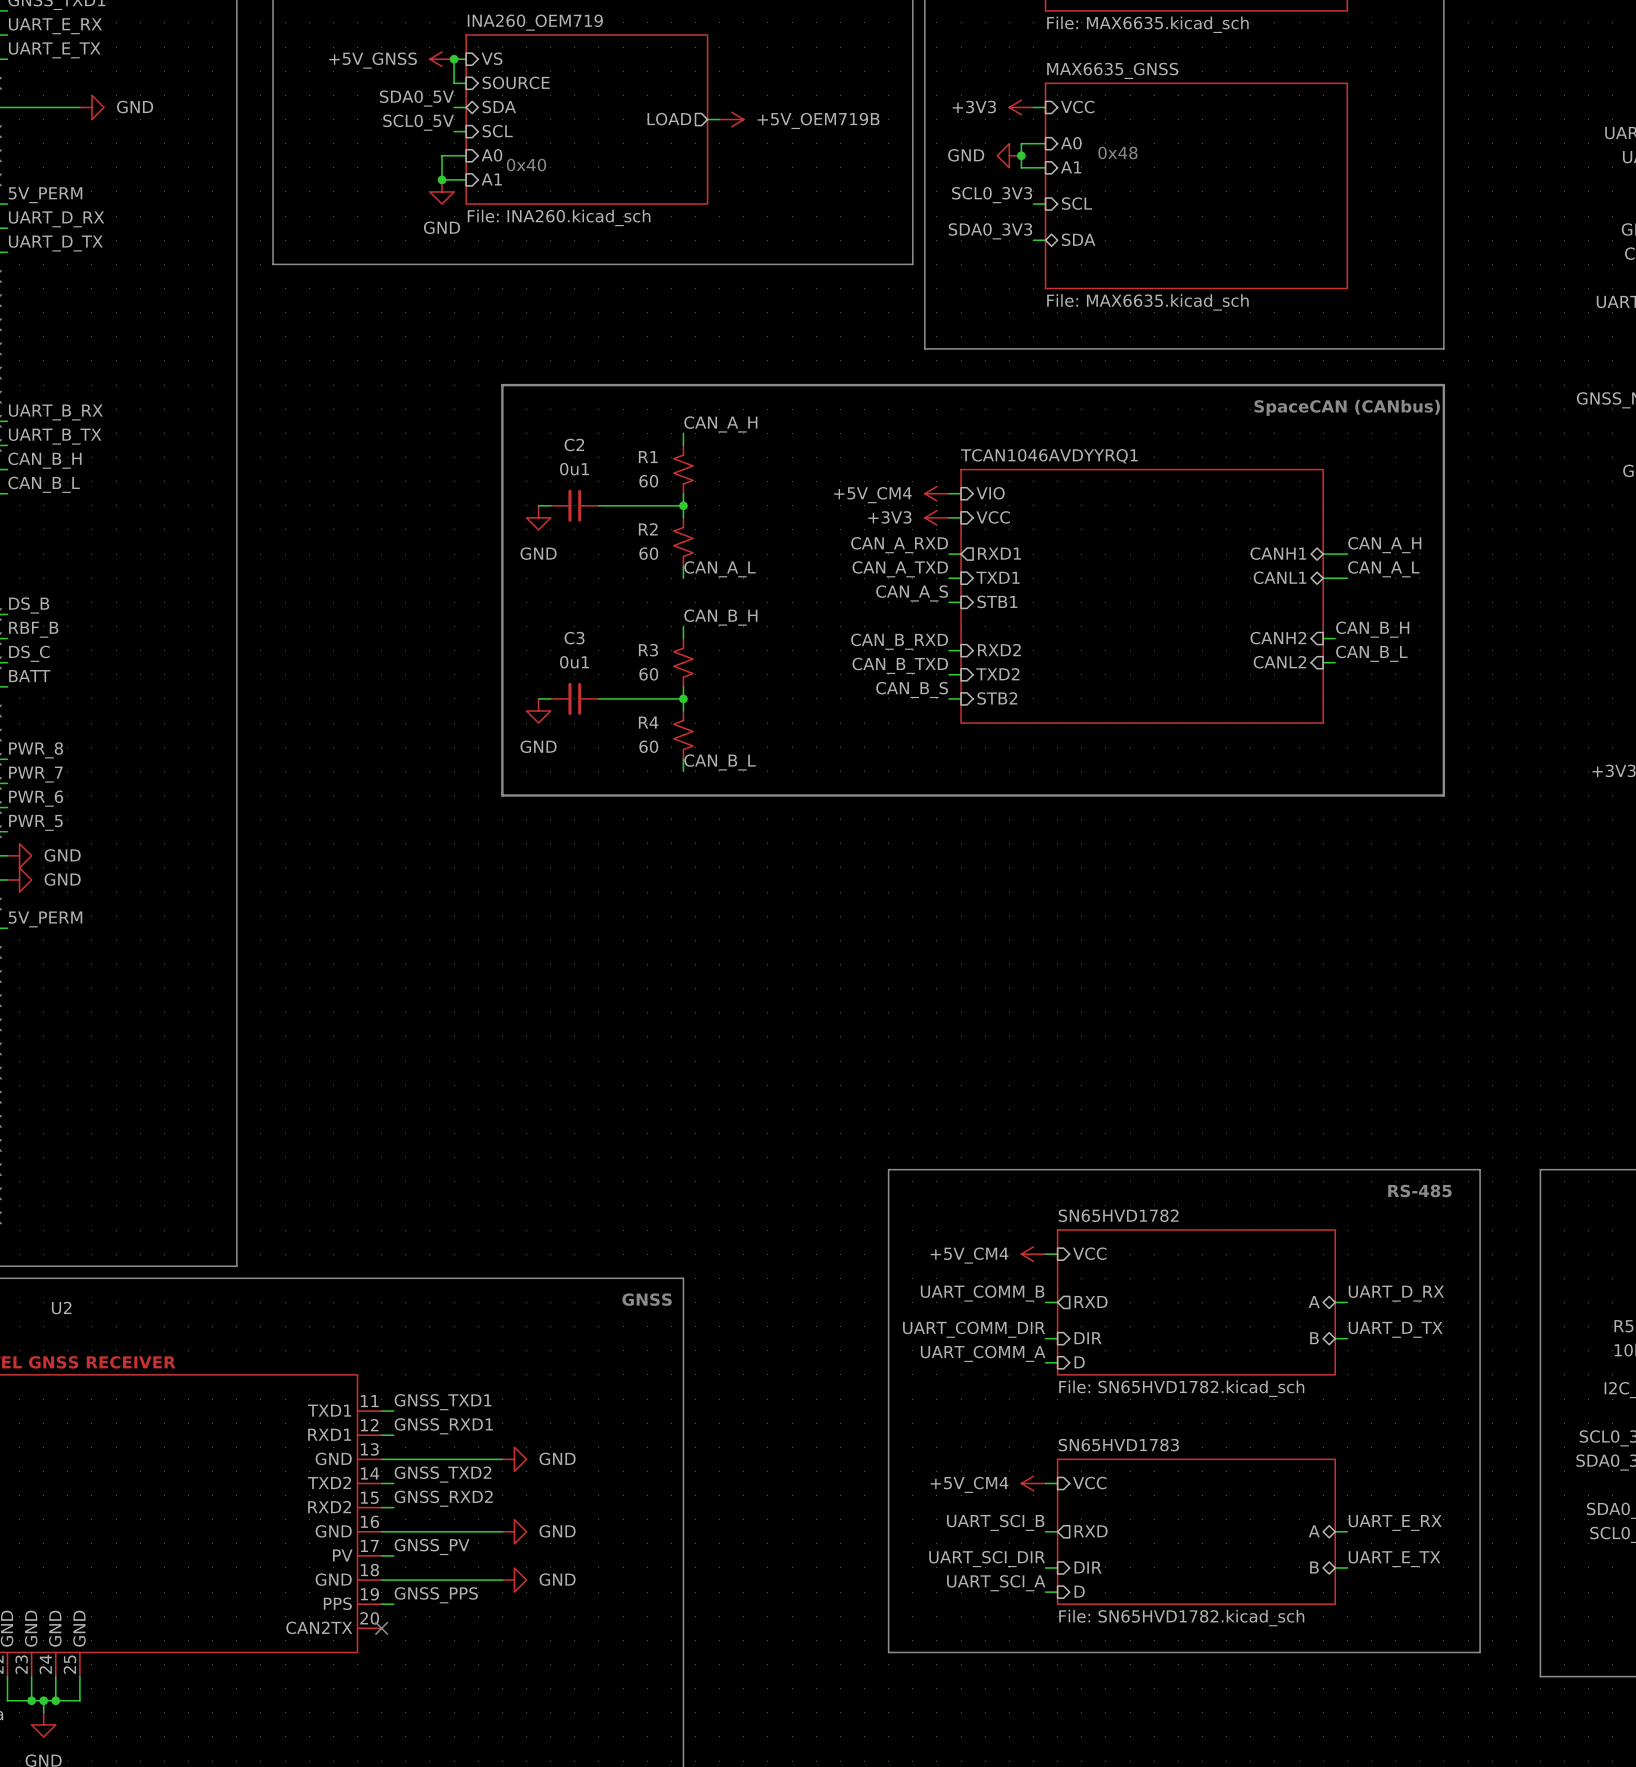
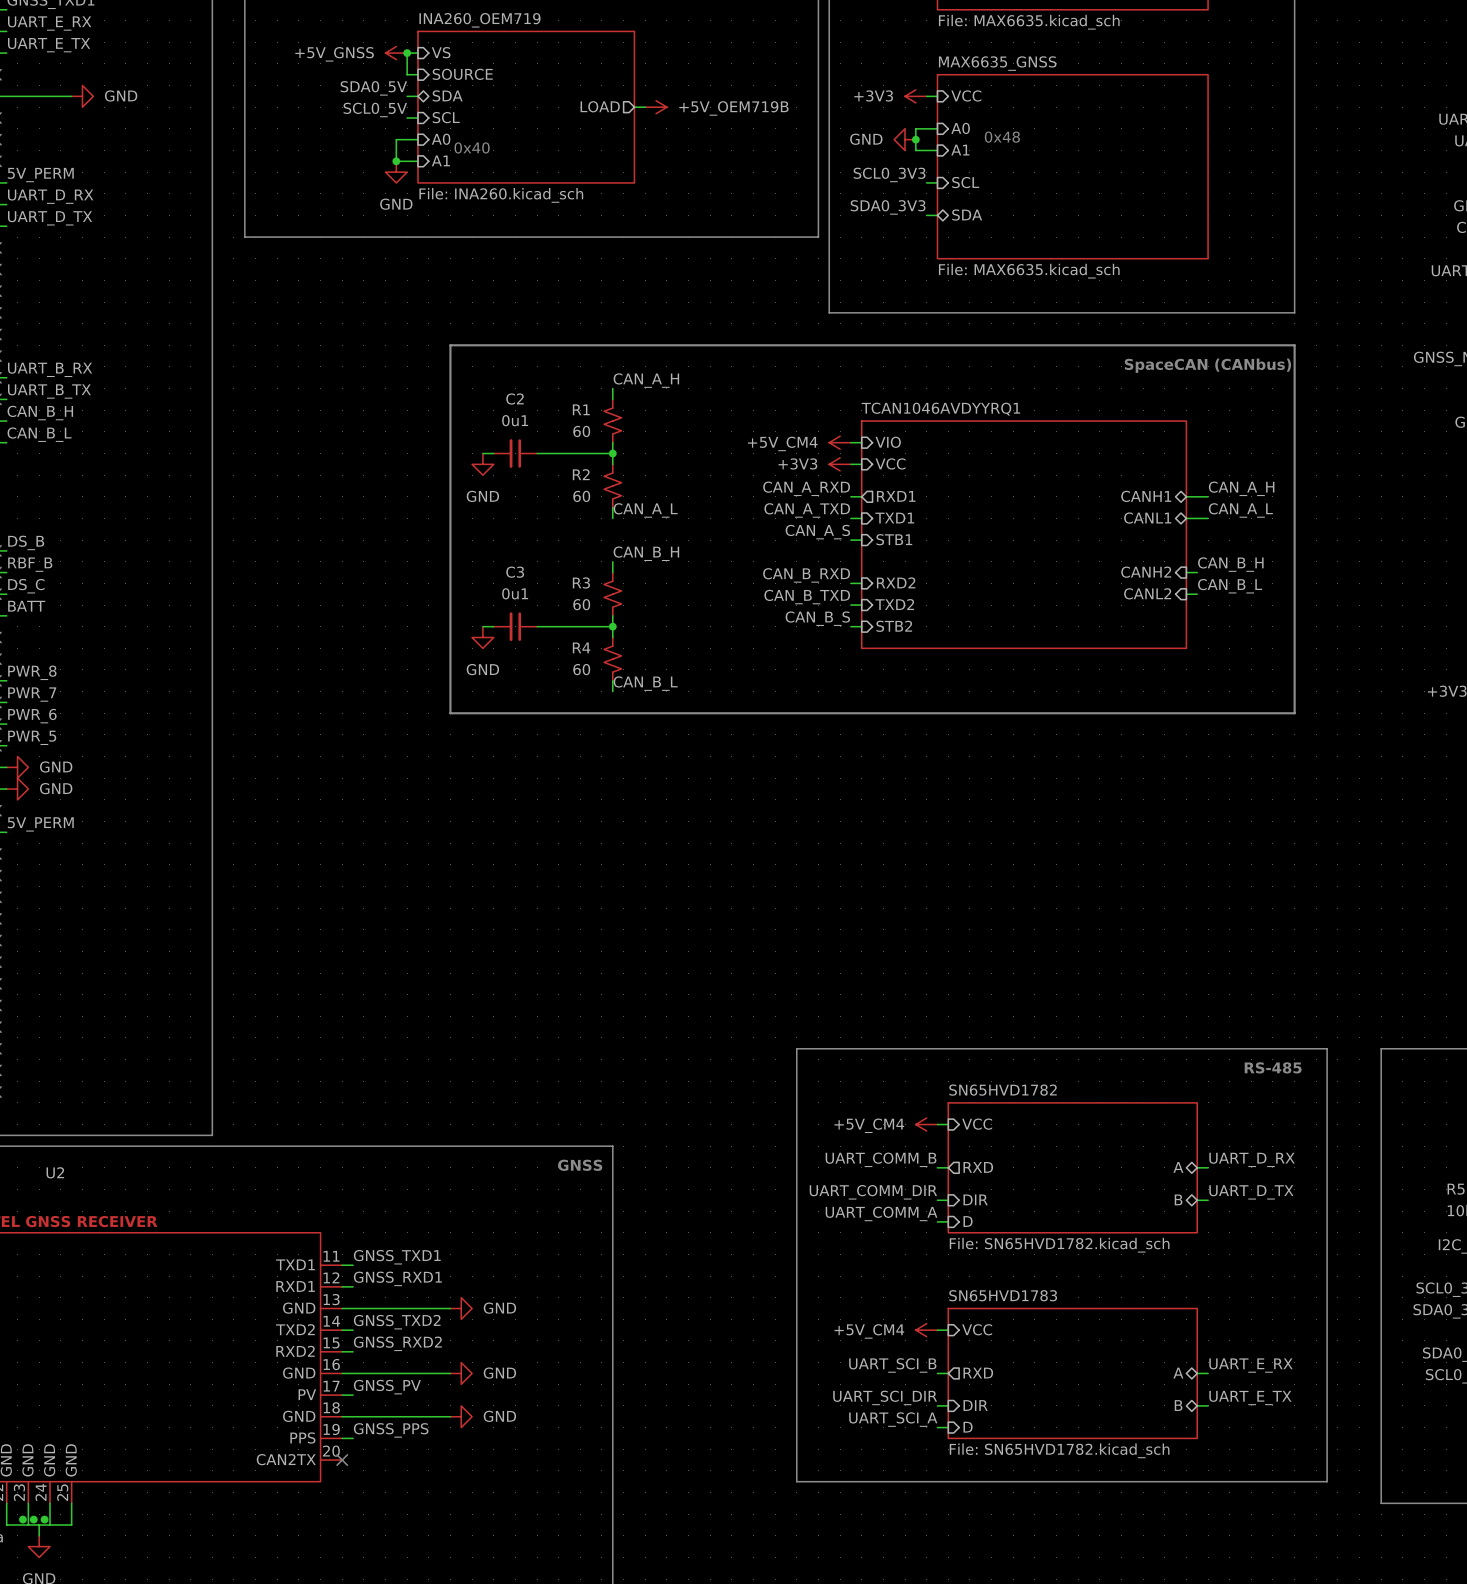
junction: none -> (22, 1519)
junction: none -> (33, 1519)
junction: none -> (44, 1519)
junction: (31, 1700) -> none
junction: (43, 1700) -> none
junction: (55, 1700) -> none

